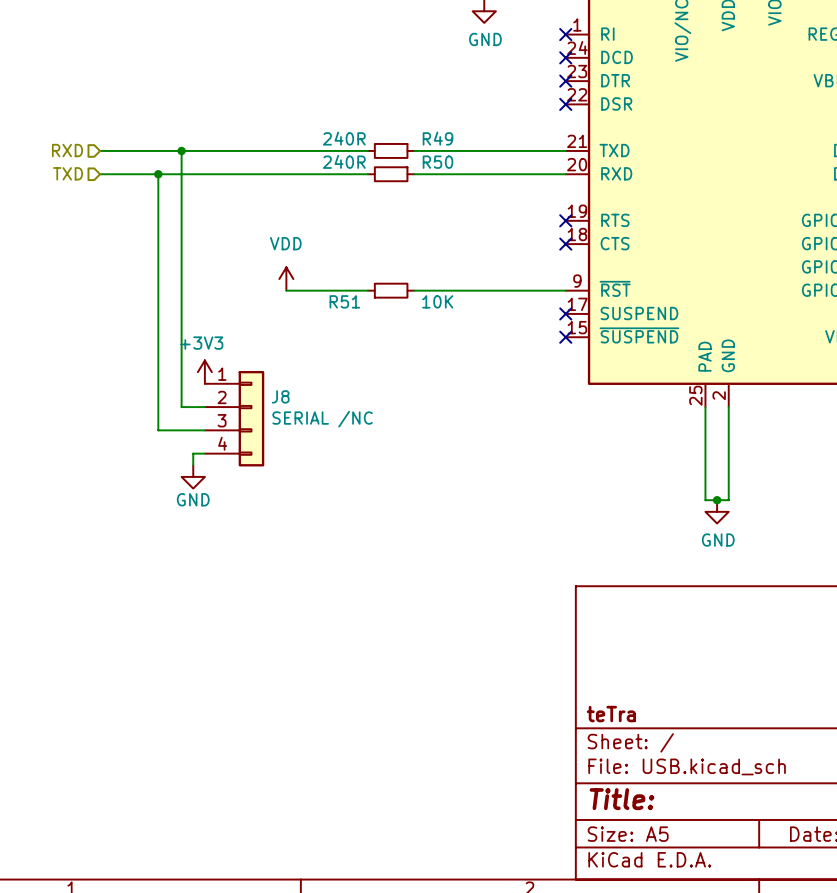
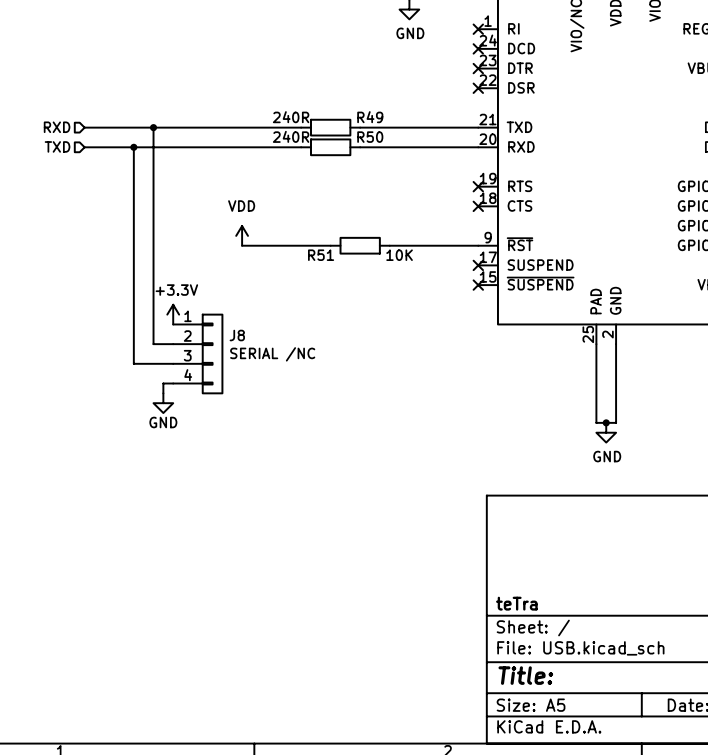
R49 symbol: [367, 143, 415, 159] -> [301, 118, 361, 137]
R50 symbol: [367, 166, 415, 183] -> [301, 138, 361, 157]
R51 symbol: [367, 282, 415, 299] -> [330, 236, 390, 255]
wire: none -> (310, 245) (330, 245)
wire: (414, 290) (460, 290) -> none
power symbol: +3V3 (204, 372) -> +3.3V (173, 314)

